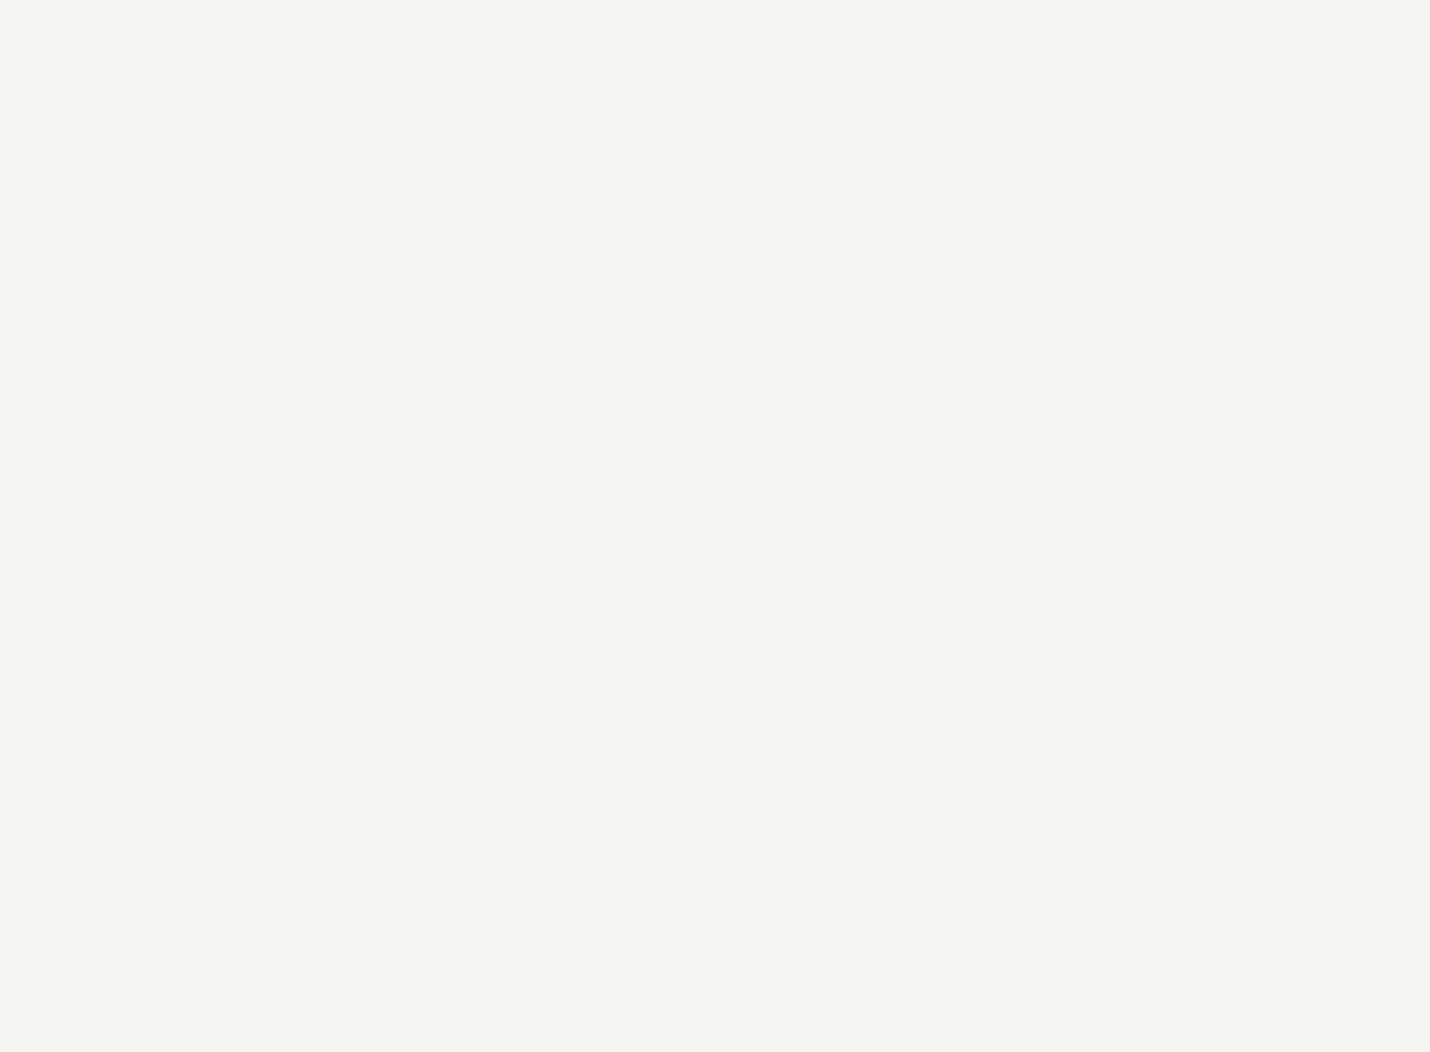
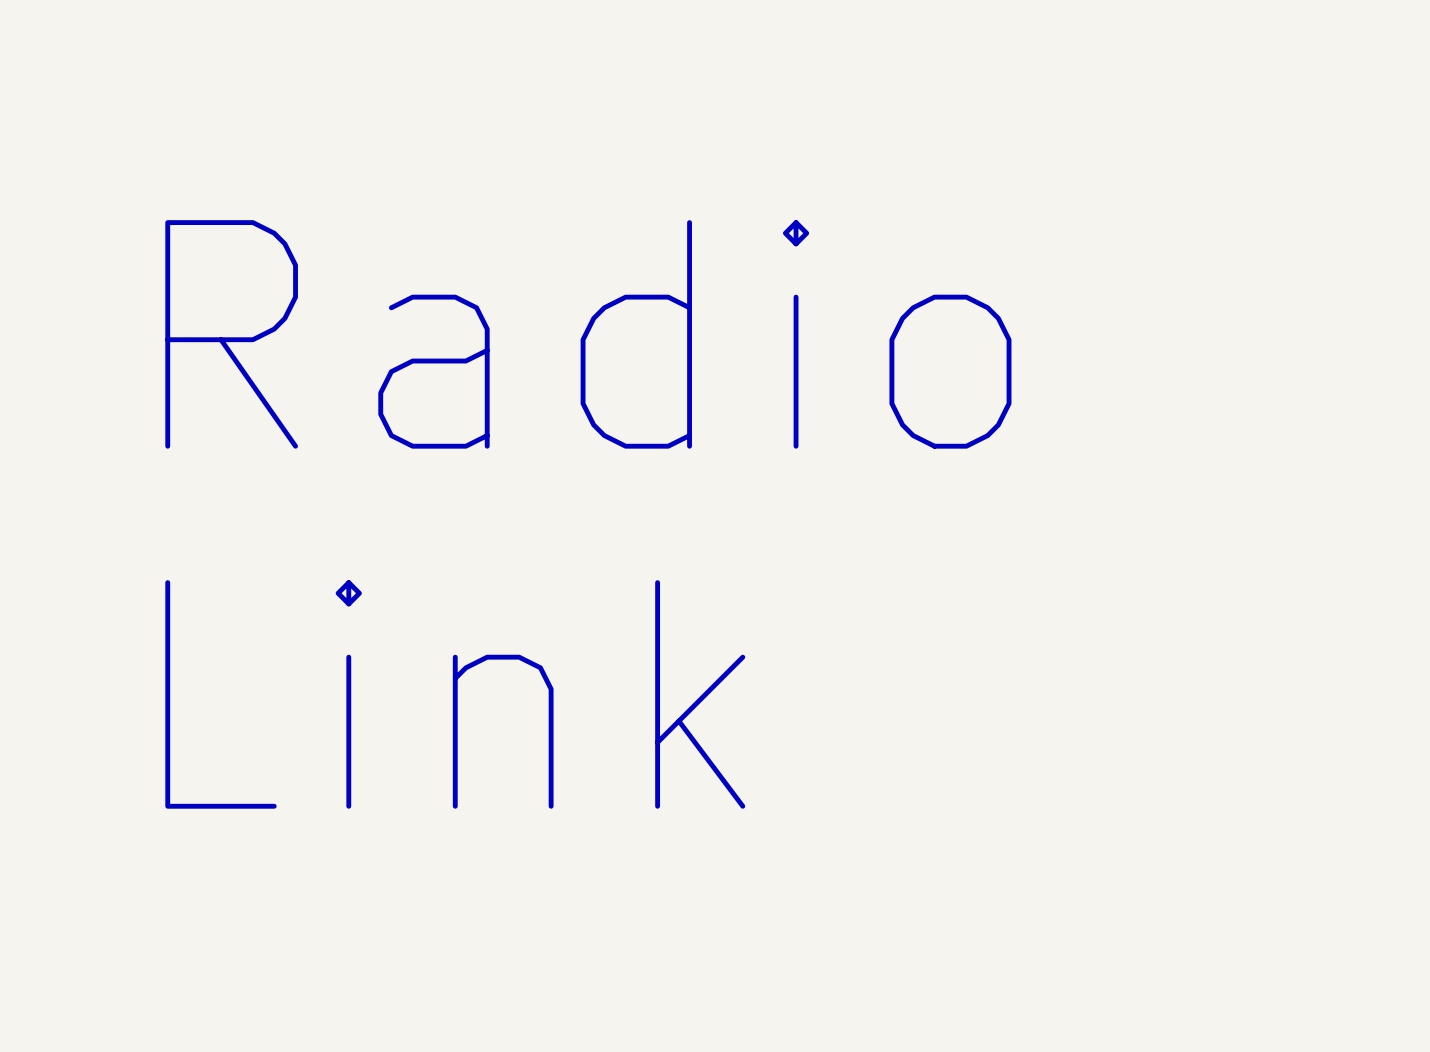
text: none -> Radio (588, 334)
text: none -> Link (455, 694)

